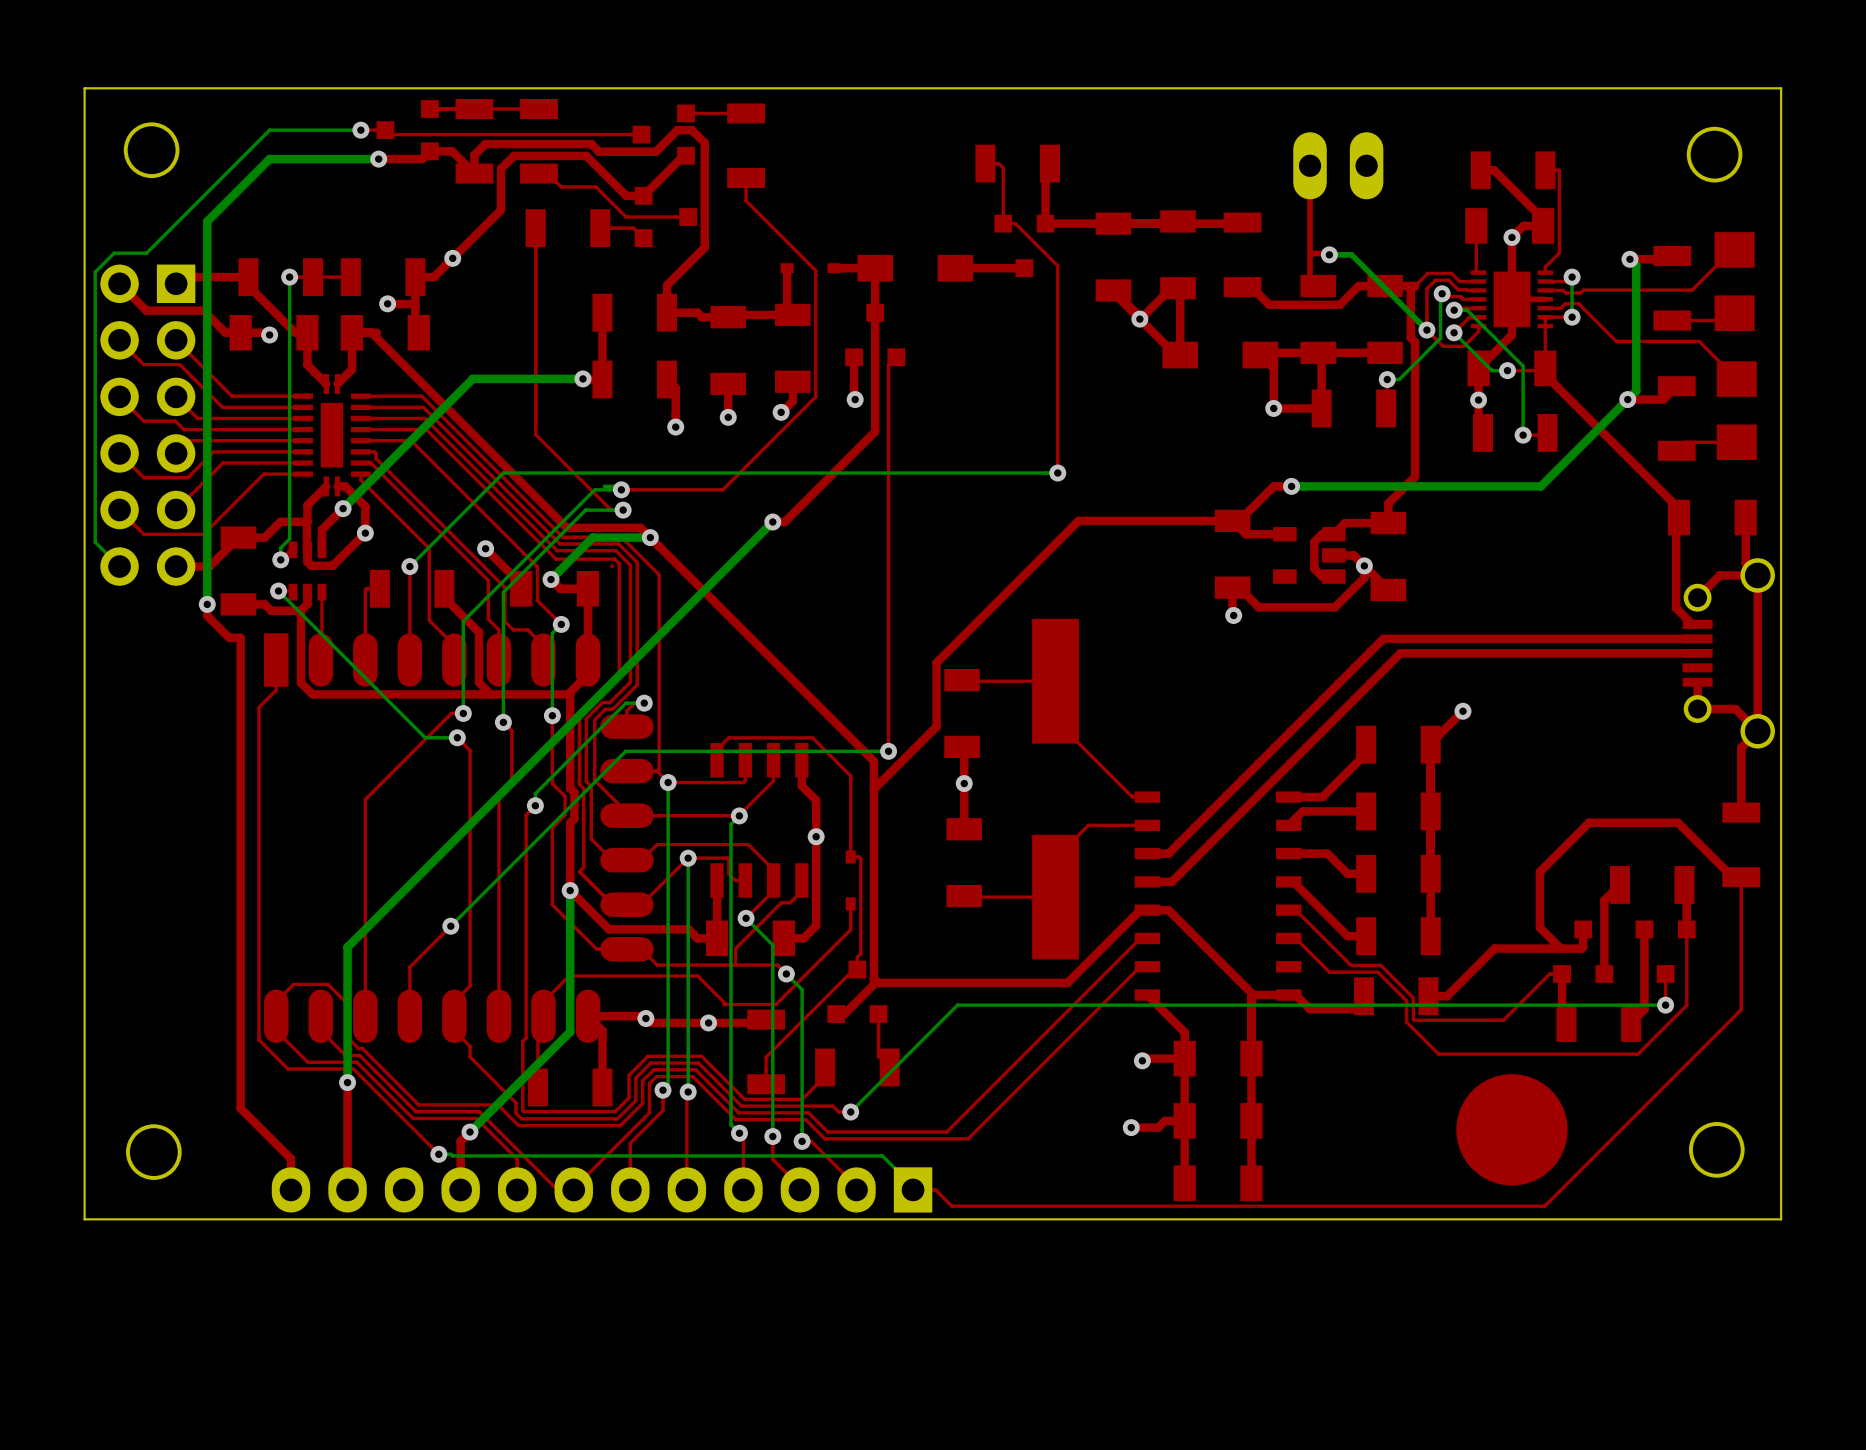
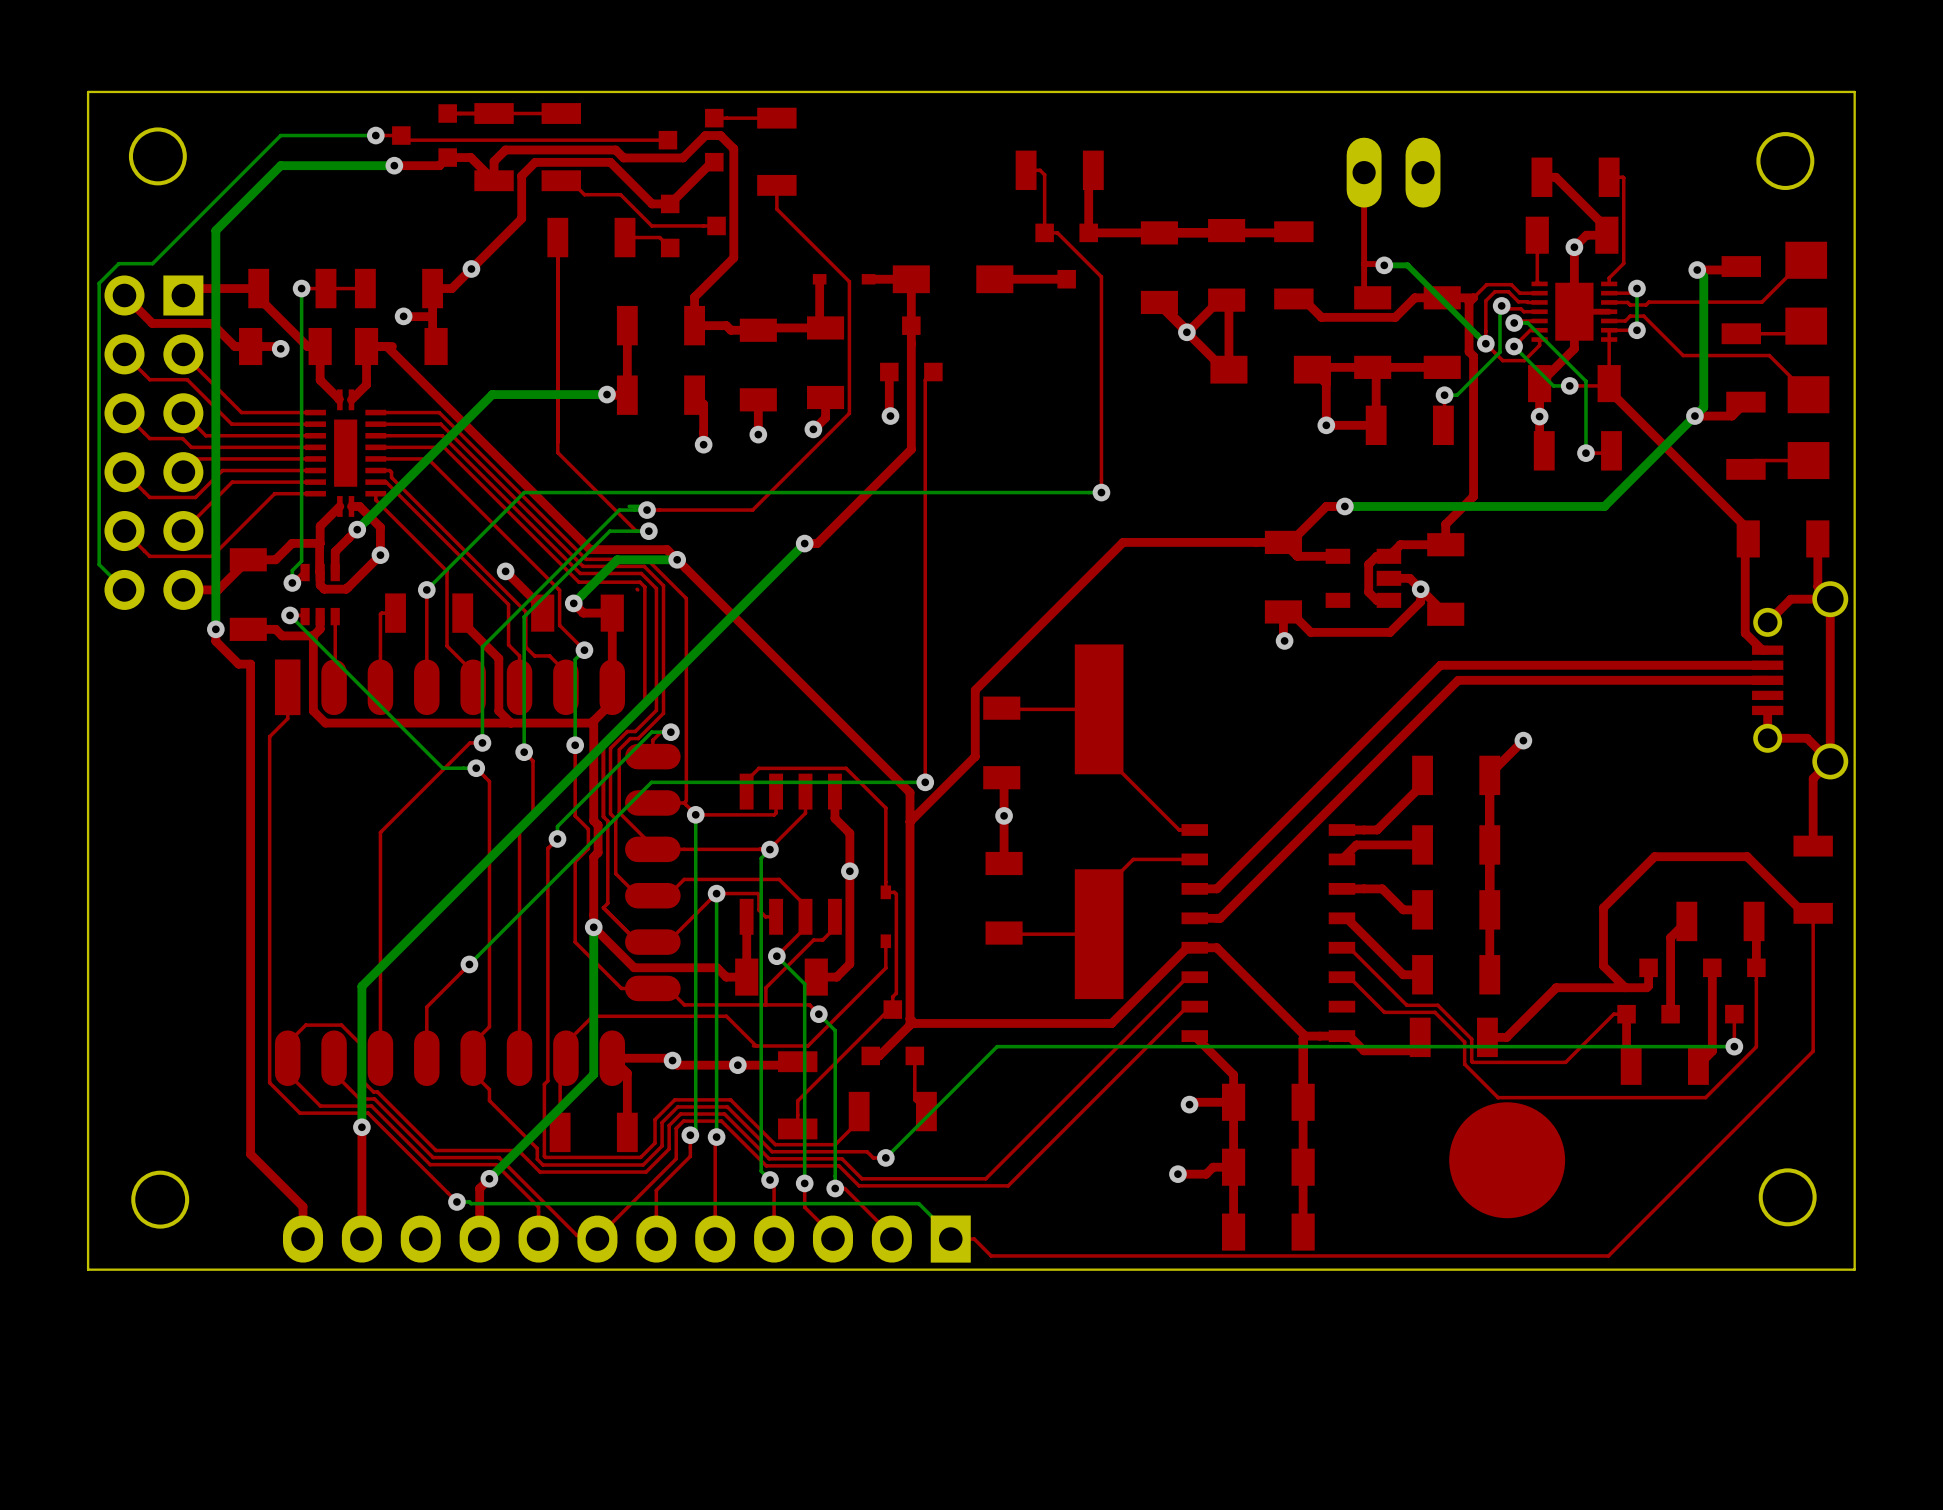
part position: (1511, 1129) -> (1507, 1160)

